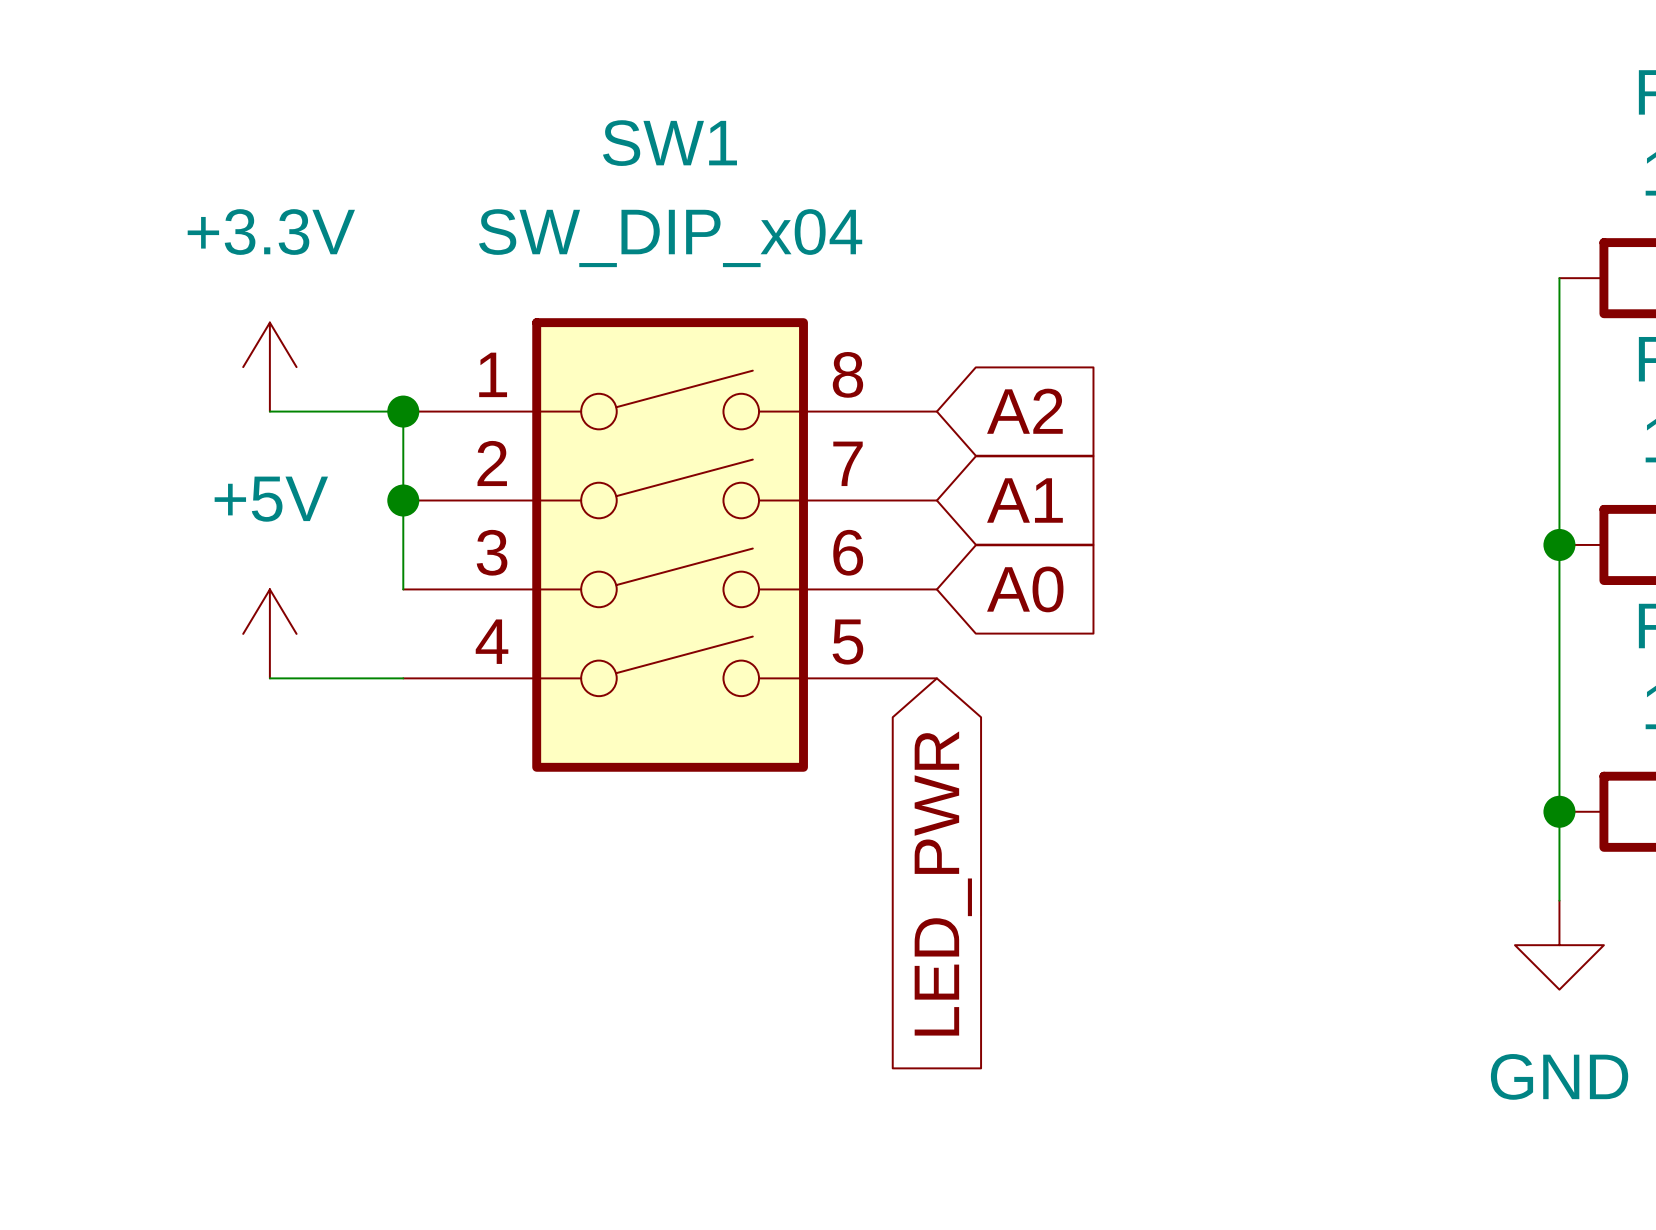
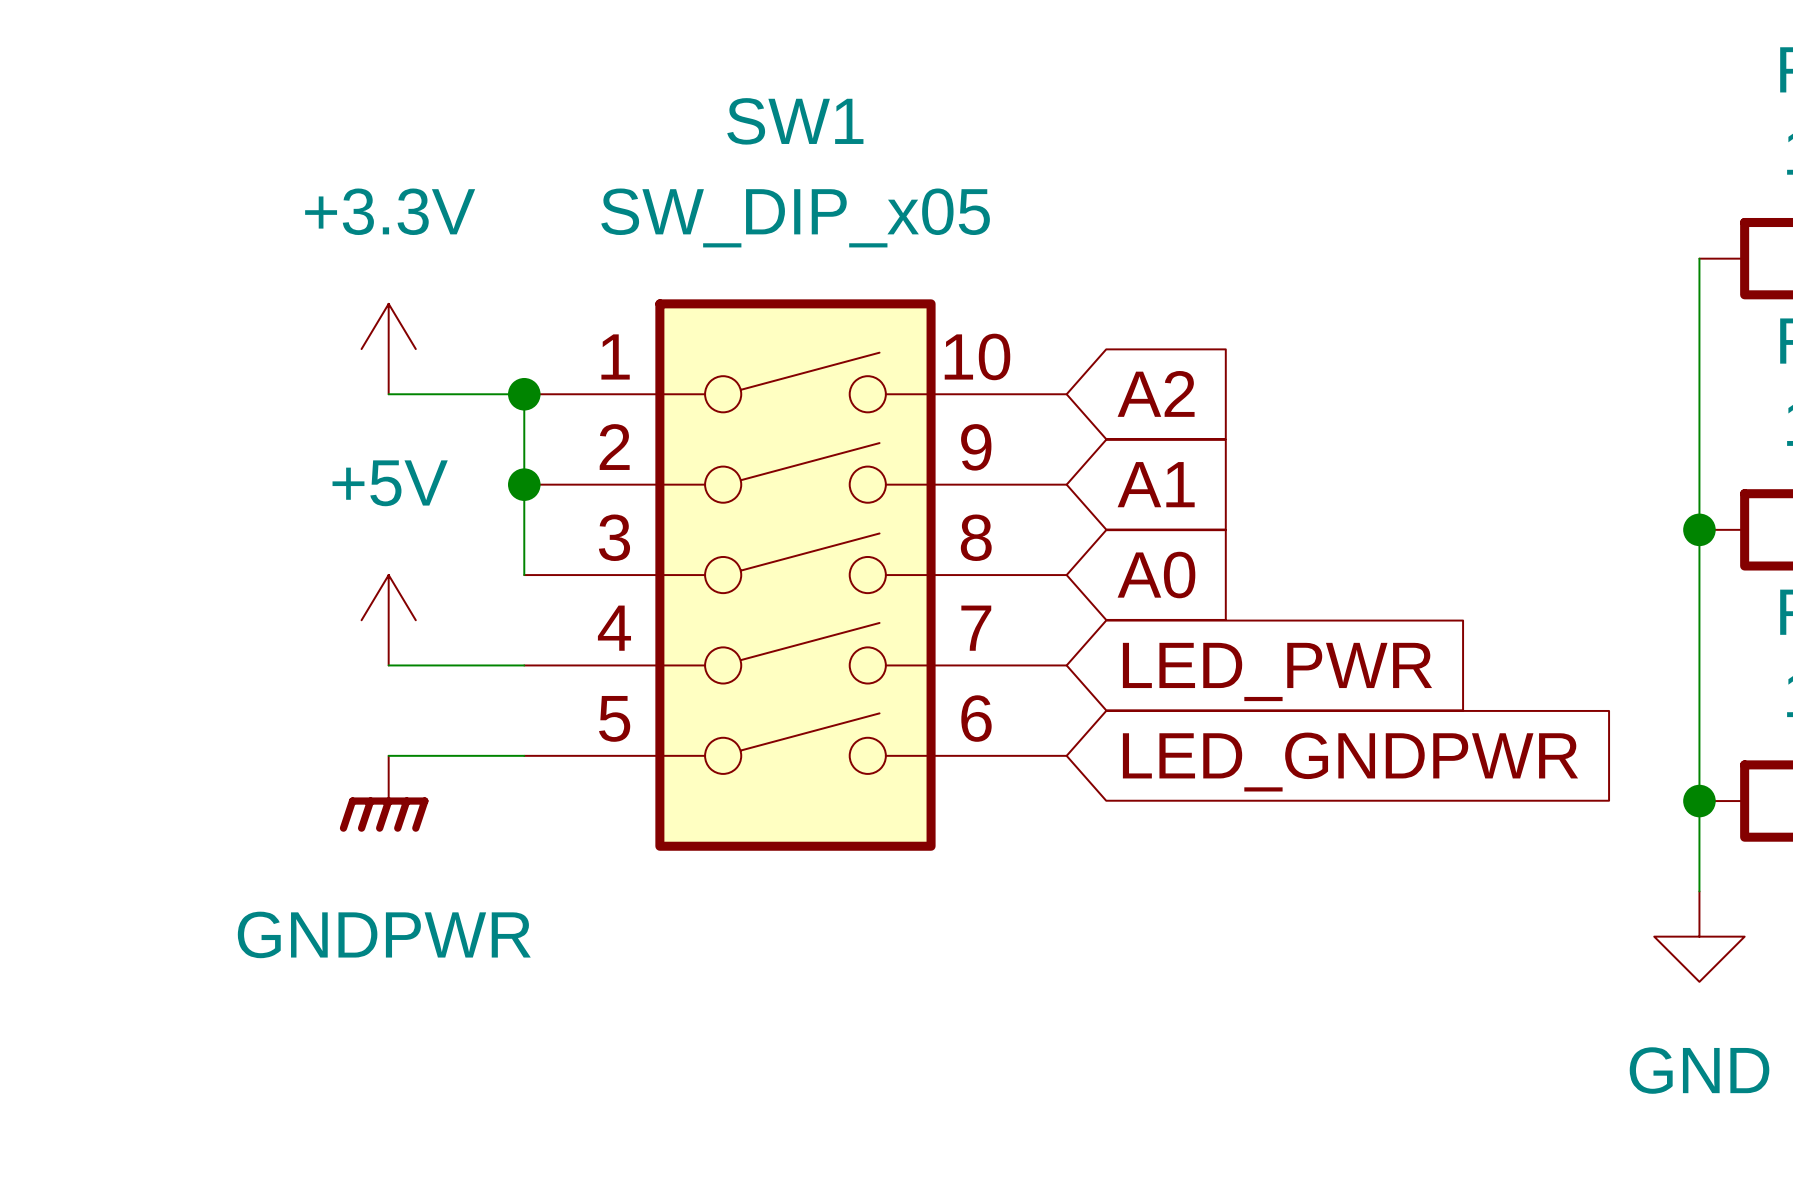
SW1 value: SW_DIP_x04 (670, 238) -> SW_DIP_x05 (795, 217)
SW1 symbol: [403, 318, 937, 772] -> [524, 299, 1067, 851]
wire: none -> (388, 755) (524, 755)
global label: none -> LED_GNDPWR (1350, 762)
power symbol: none -> GNDPWR (384, 793)
global label rotation: 0° (943, 883) -> 90° counterclockwise (1277, 671)

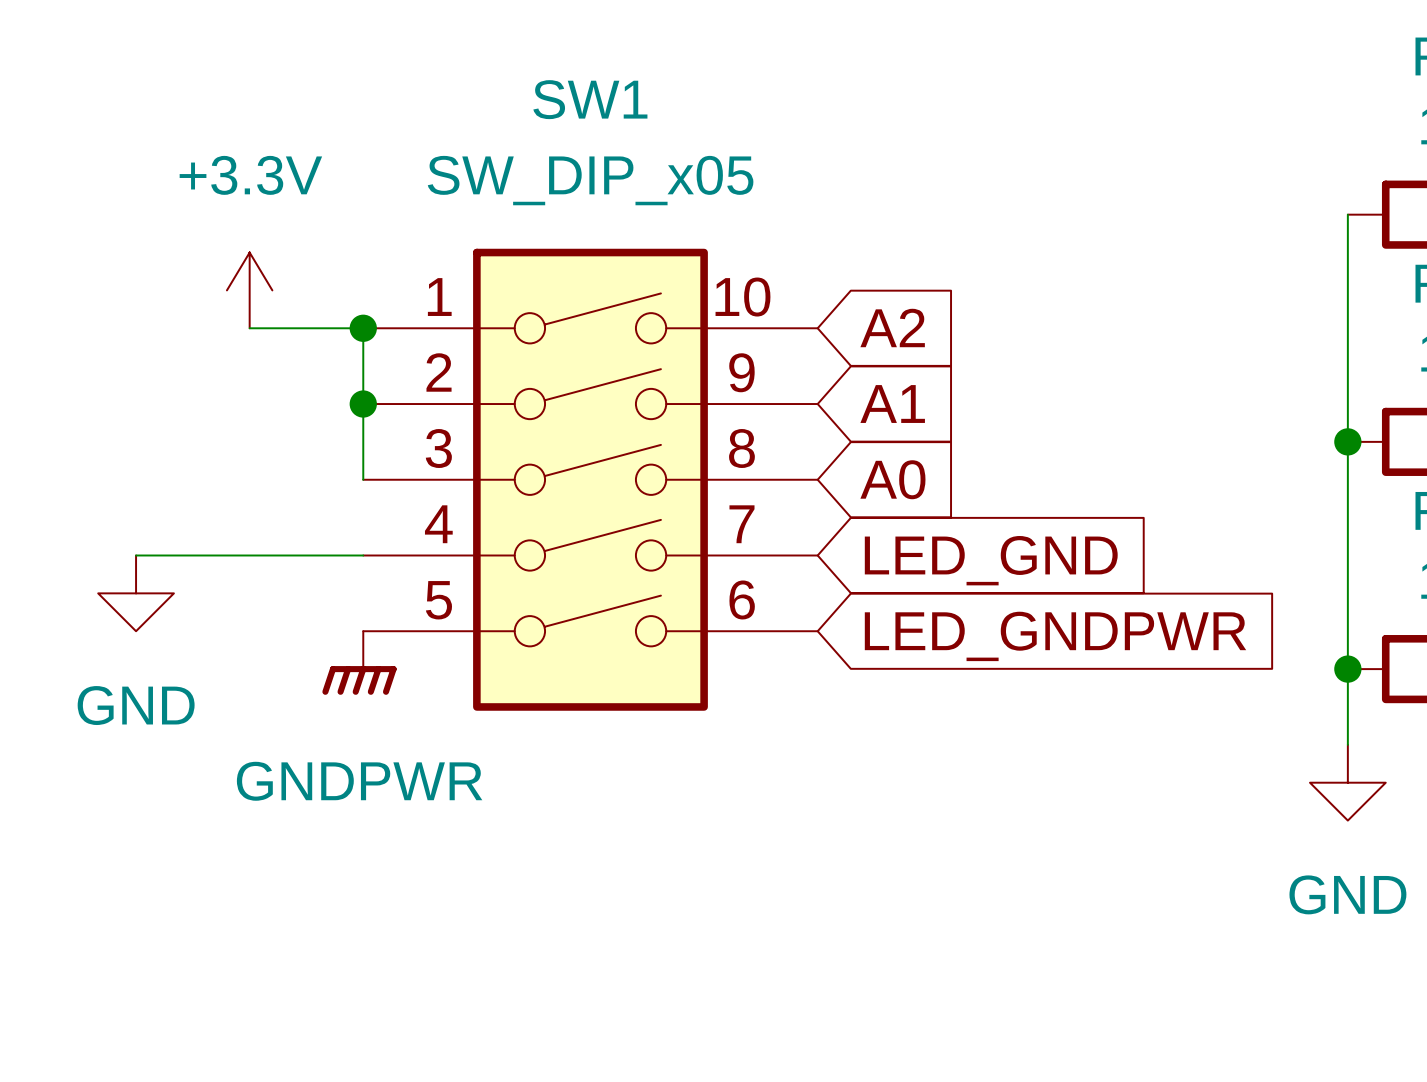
power symbol: +5V (388, 620) -> none
global label: LED_PWR (1277, 671) -> LED_GND (991, 560)
power symbol: none -> GND (136, 593)
wire: (388, 755) (524, 755) -> (136, 555) (249, 555)
power symbol position: GNDPWR (384, 793) -> GNDPWR (359, 663)

